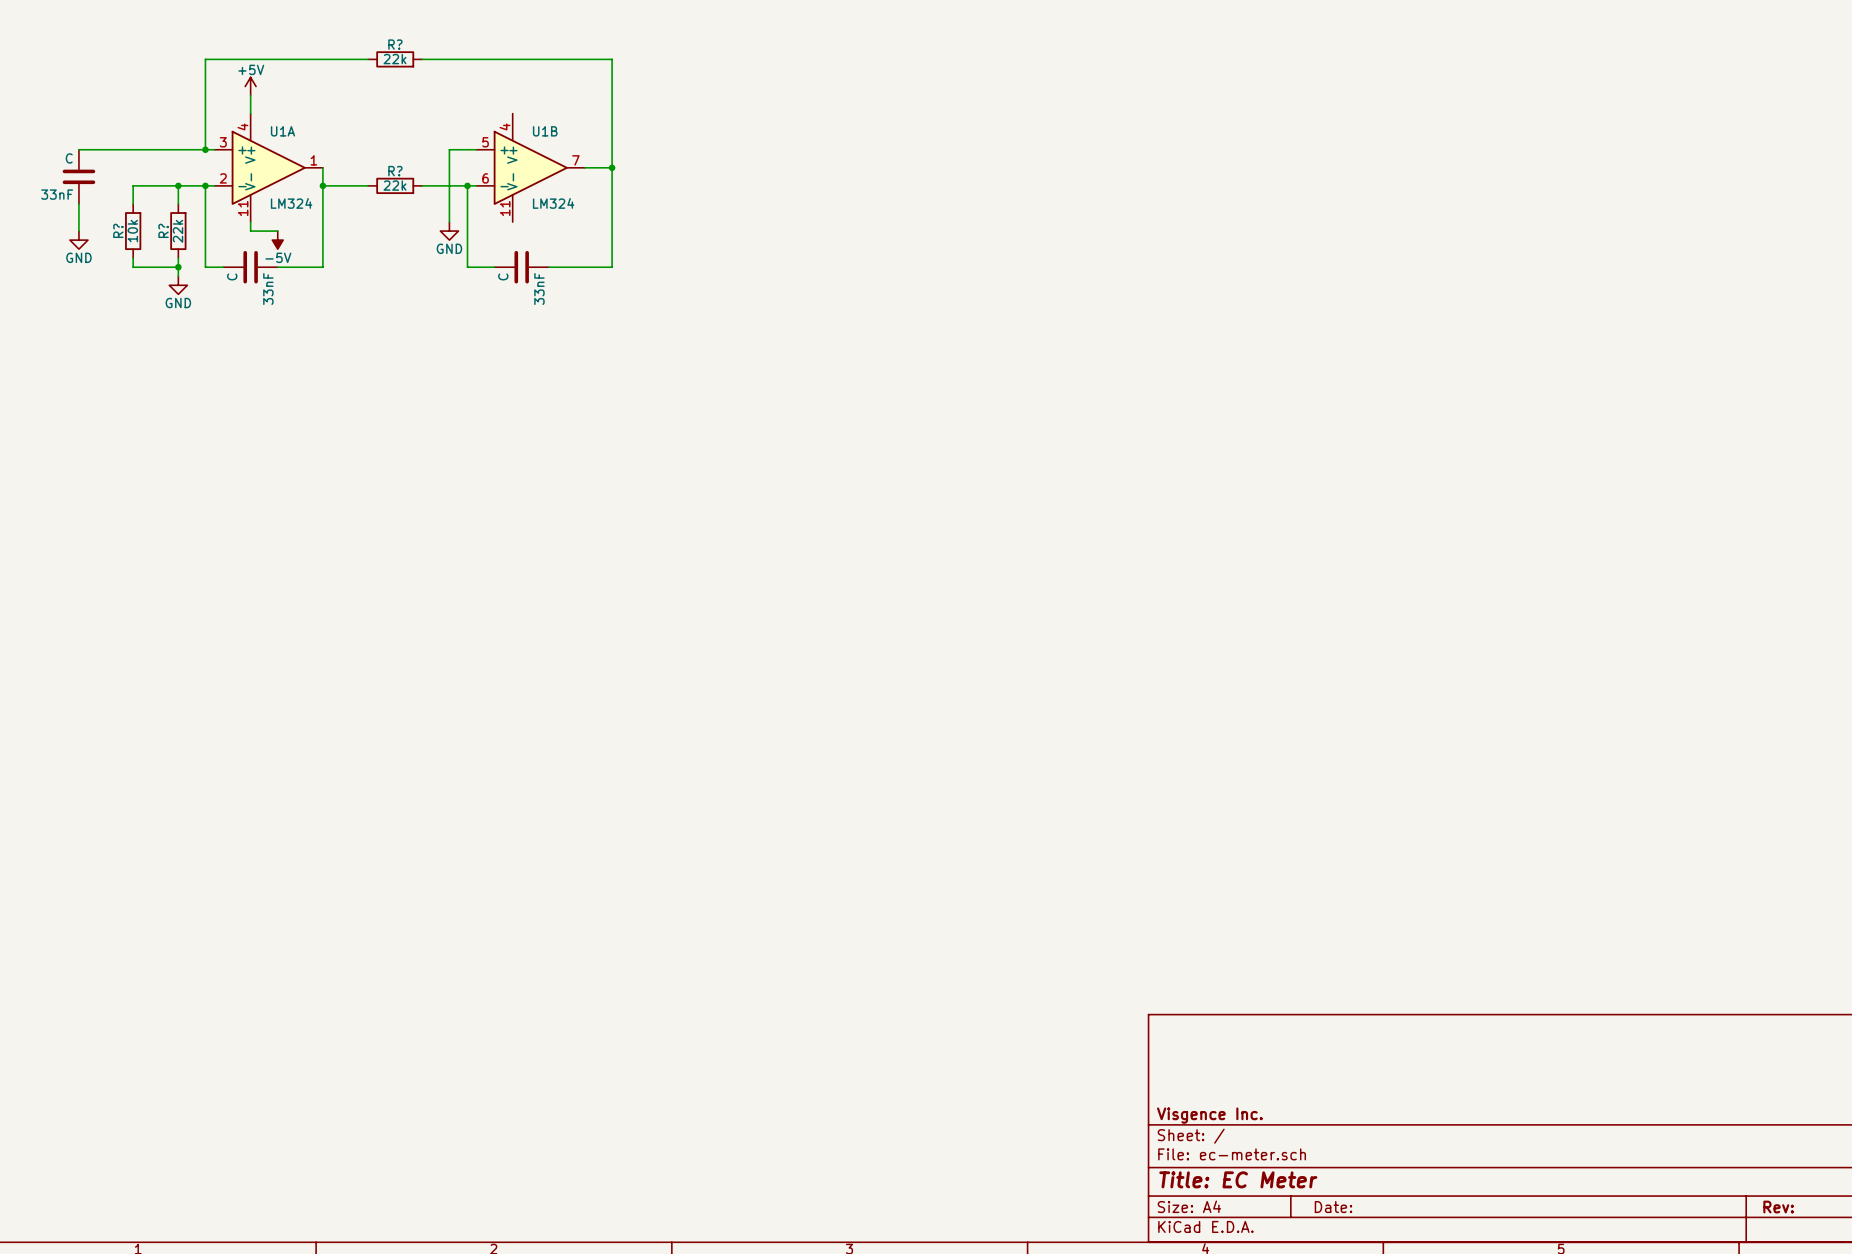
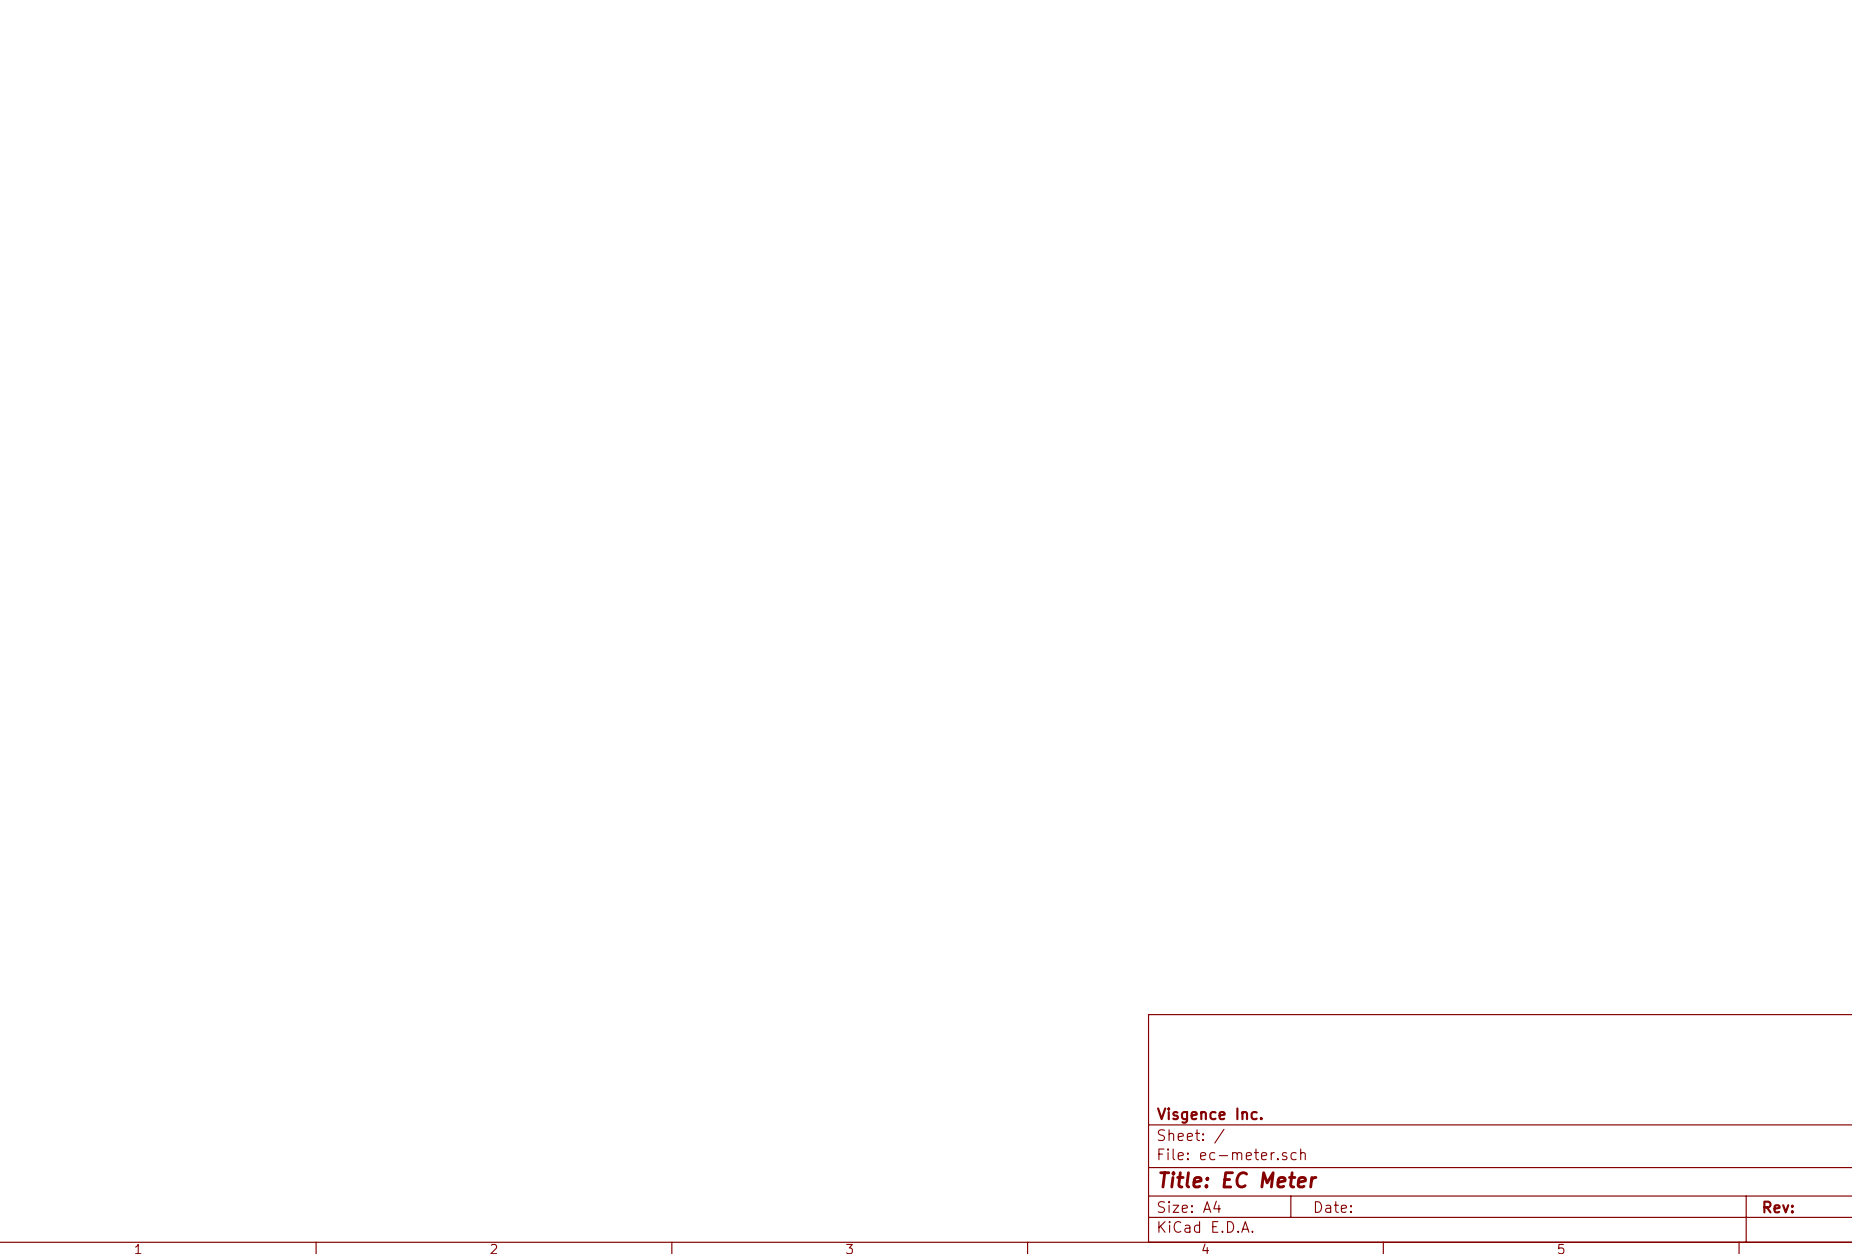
wire: (368, 59) (205, 59) (205, 149) -> none
R?: 22k (395, 59) -> none
wire: (422, 59) (612, 59) (612, 267) (548, 267) -> none
power symbol: +5V (250, 86) -> none
wire: (250, 95) (250, 113) -> none
wire: (78, 149) (214, 149) -> none
junction: (205, 149) -> none
wire: (476, 149) (449, 149) (449, 222) -> none
U1A: LM324 (268, 167) -> none
wire: (322, 167) (322, 267) (277, 267) -> none
U1B: LM324 (530, 167) -> none
wire: (584, 167) (612, 167) -> none
junction: (612, 167) -> none
33nF: C (78, 176) -> none
wire: (178, 185) (178, 203) -> none
junction: (178, 185) -> none
wire: (205, 185) (205, 267) (223, 267) -> none
junction: (205, 185) -> none
wire: (214, 185) (133, 185) (133, 203) -> none
wire: (322, 185) (368, 185) -> none
junction: (322, 185) -> none
R?: 22k (395, 185) -> none
wire: (422, 185) (476, 185) -> none
wire: (467, 185) (467, 267) (494, 267) -> none
junction: (467, 185) -> none
wire: (78, 203) (78, 231) -> none
wire: (250, 222) (250, 231) (277, 231) -> none
R?: 10k (133, 231) -> none
R?: 22k (178, 231) -> none
power symbol: GND (449, 231) -> none
power symbol: GND (78, 240) -> none
power symbol: -5V (277, 240) -> none
wire: (133, 258) (133, 267) (178, 267) -> none
wire: (178, 258) (178, 276) -> none
junction: (178, 267) -> none
33nF: C (250, 267) -> none
33nF: C (521, 267) -> none
power symbol: GND (178, 285) -> none

